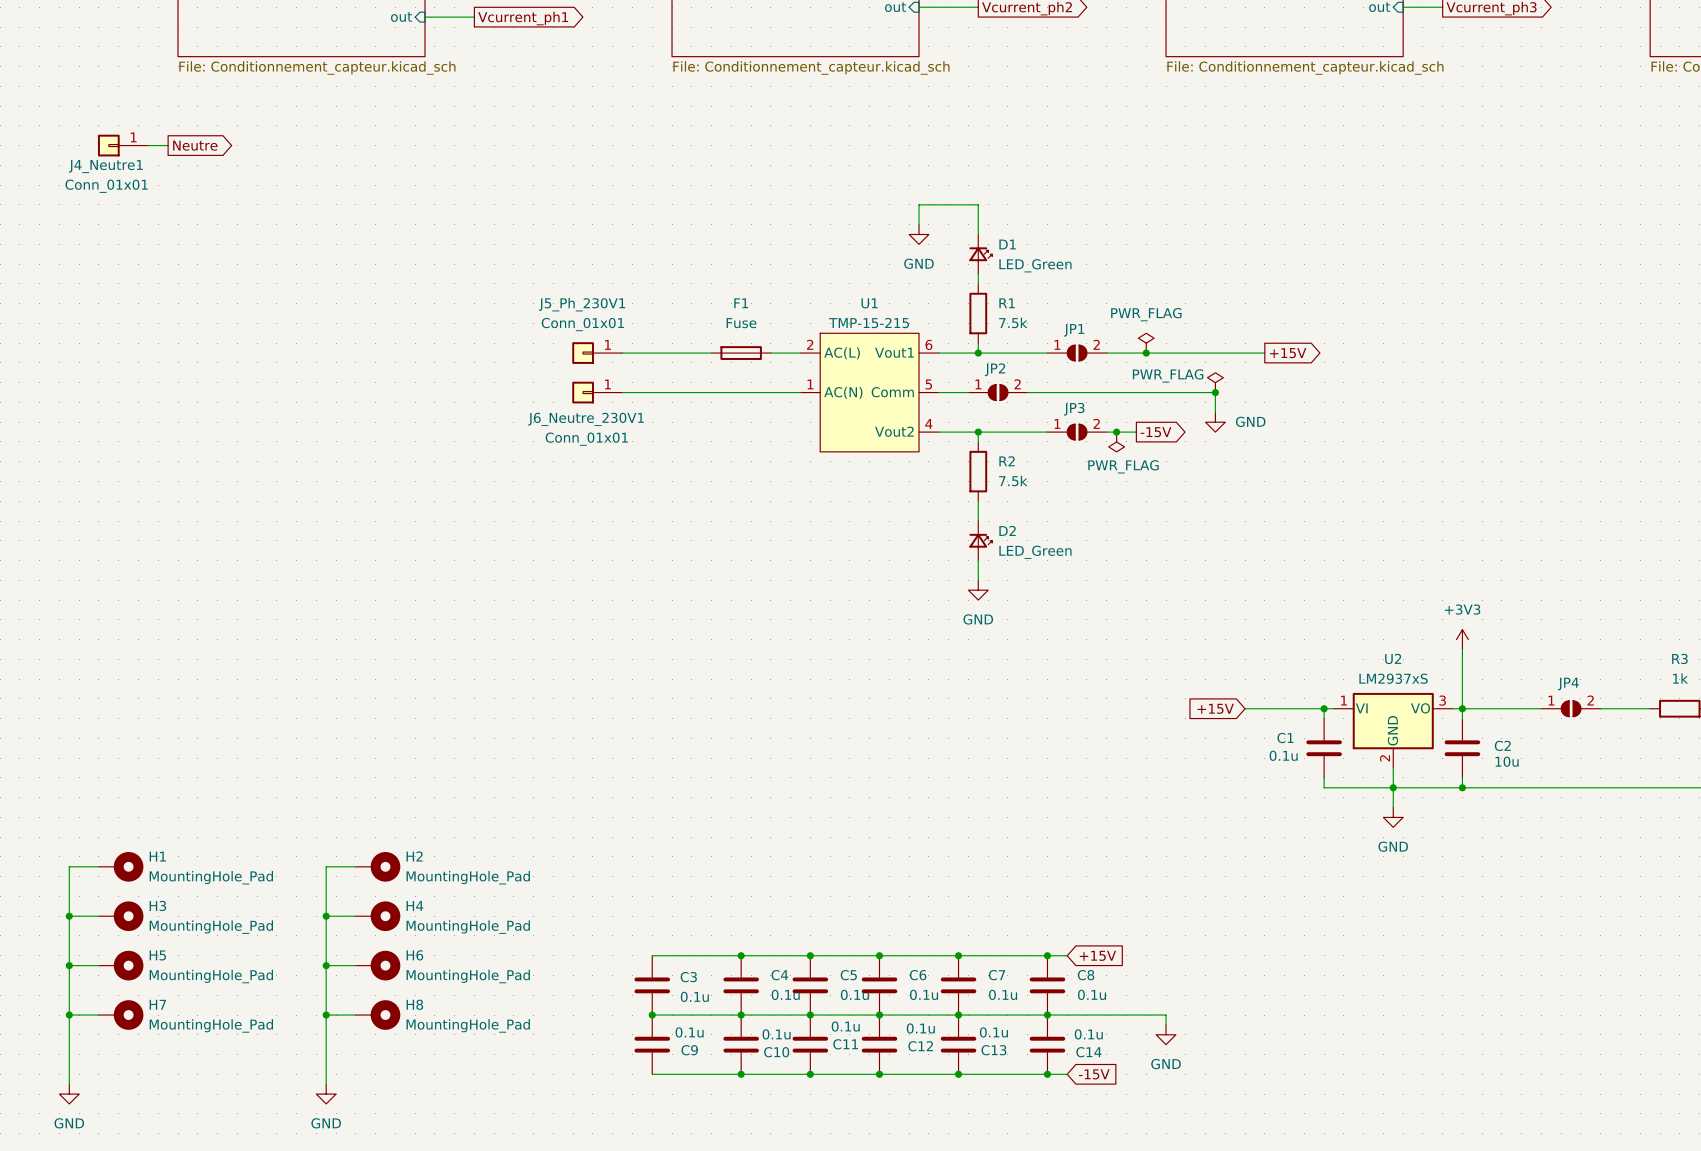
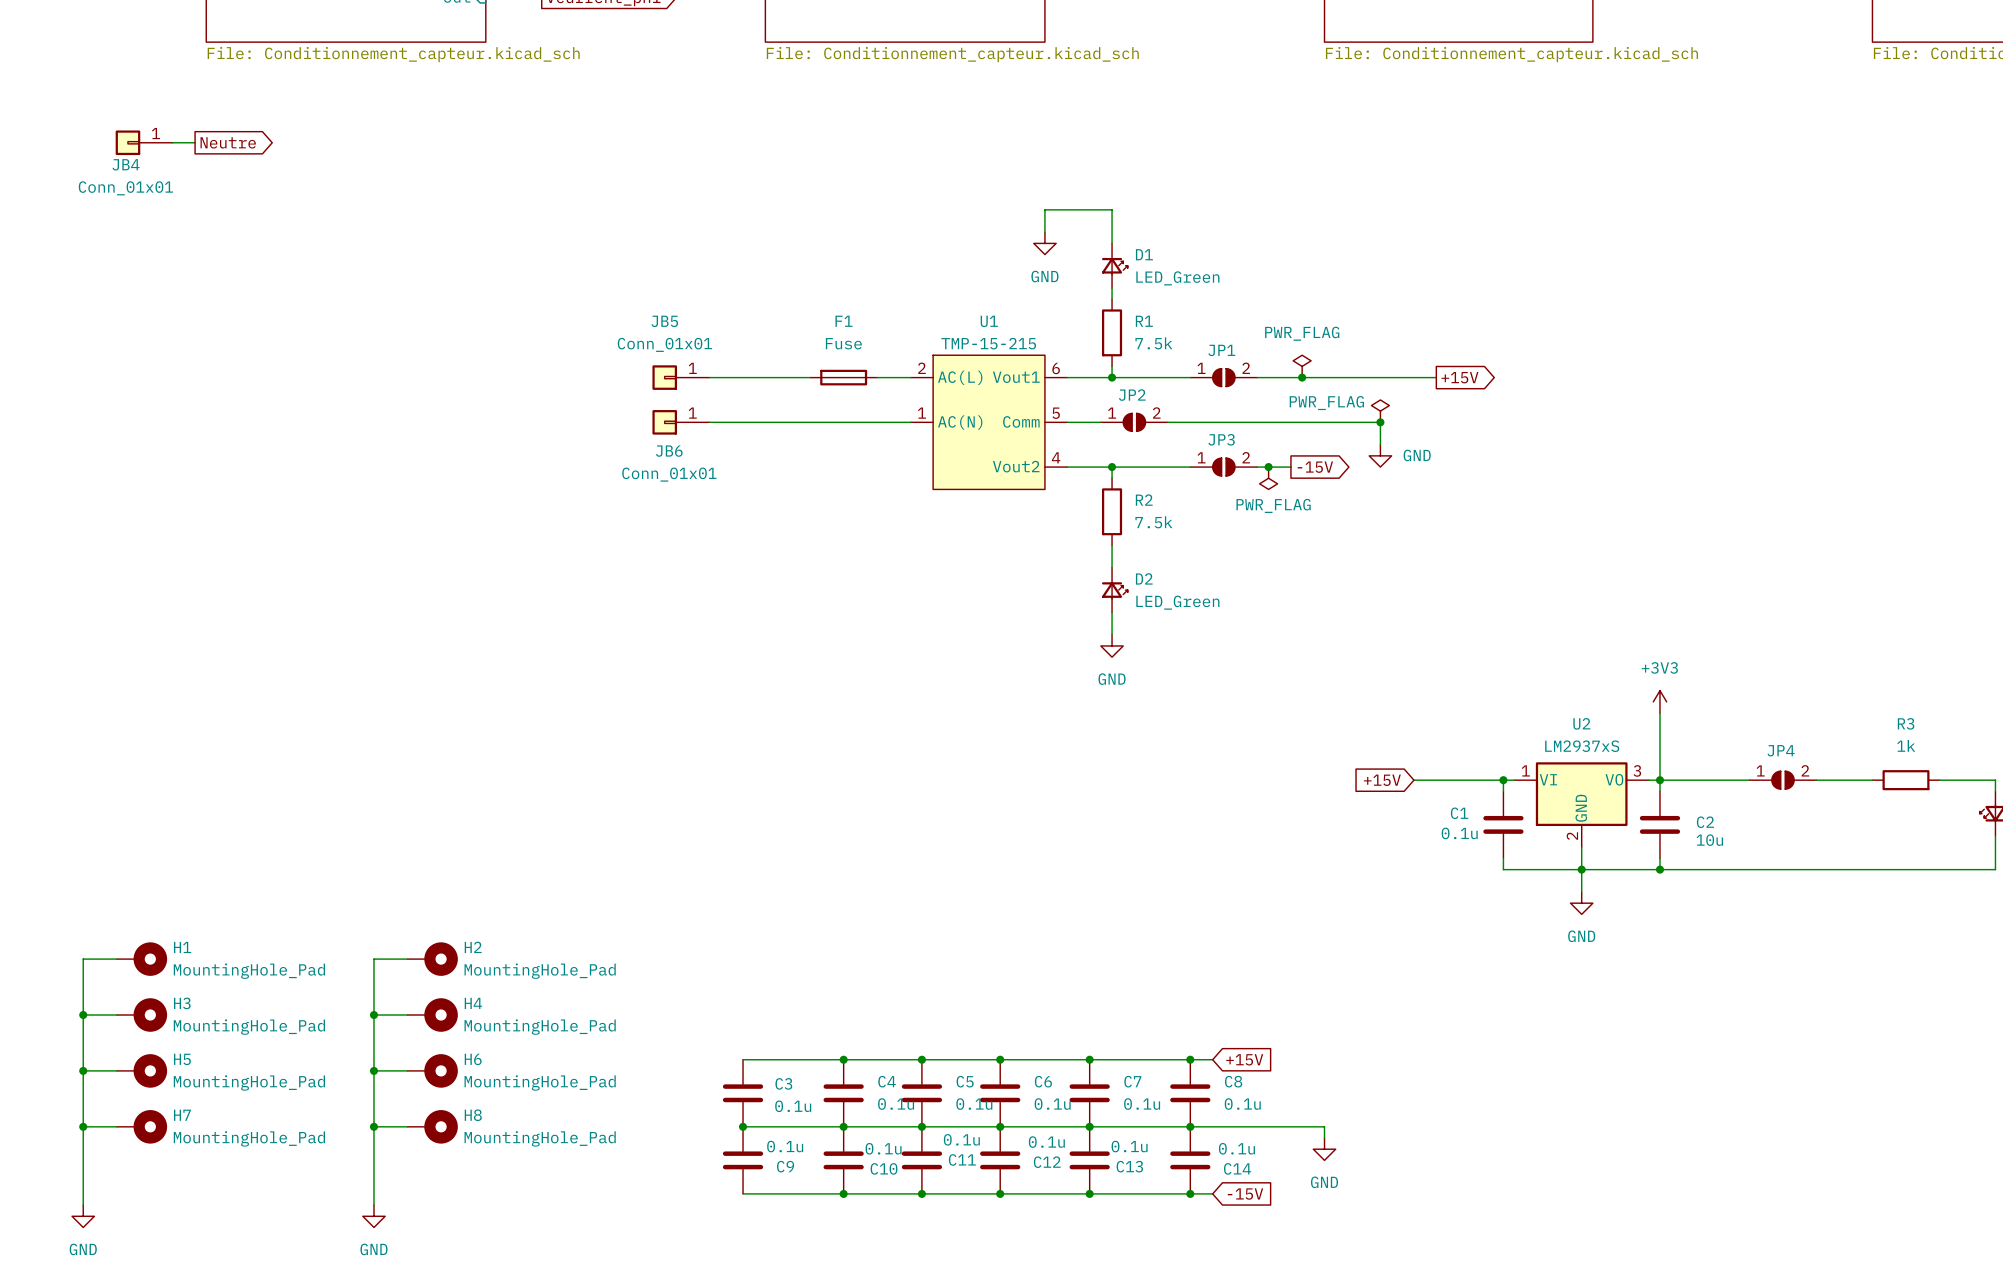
J4_Neutre1 name: J4_Neutre1 (105, 166) -> JB4 (126, 164)
J5_Ph_230V1 name: J5_Ph_230V1 (582, 304) -> JB5 (664, 321)
J6_Neutre_230V1 name: J6_Neutre_230V1 (586, 419) -> JB6 (669, 451)

